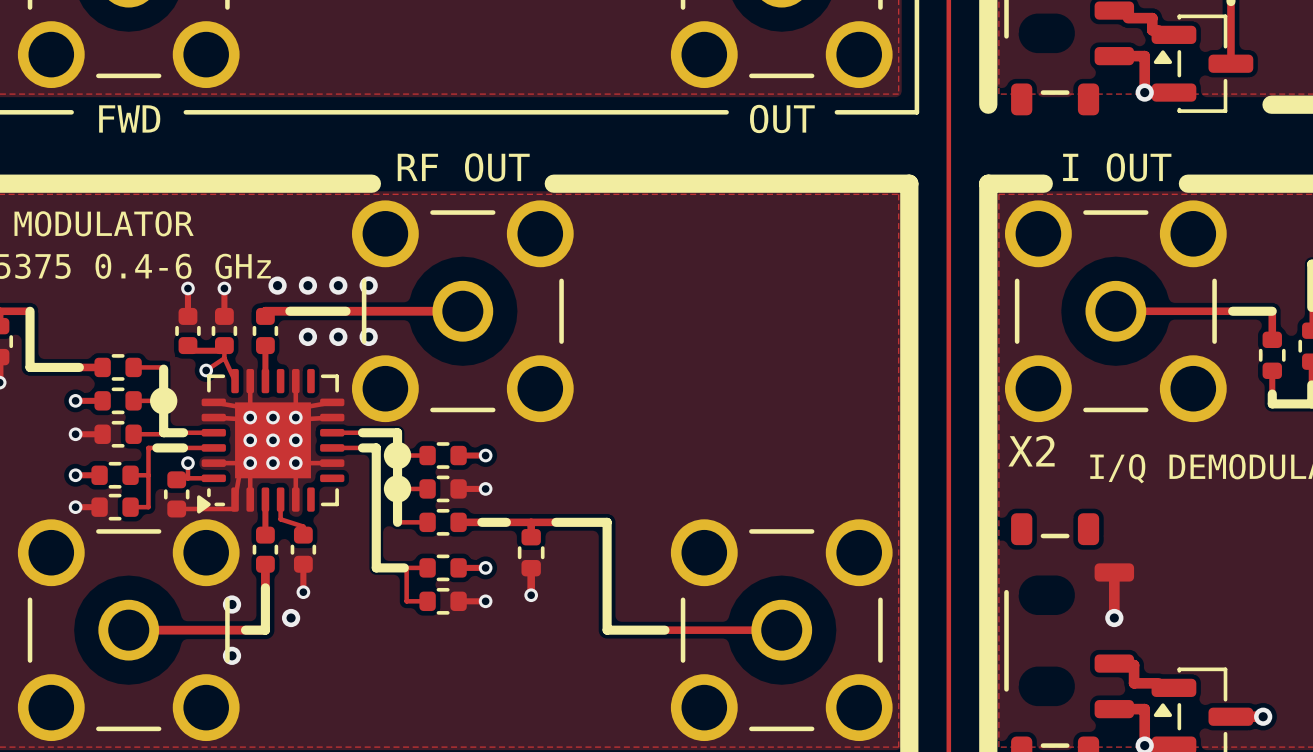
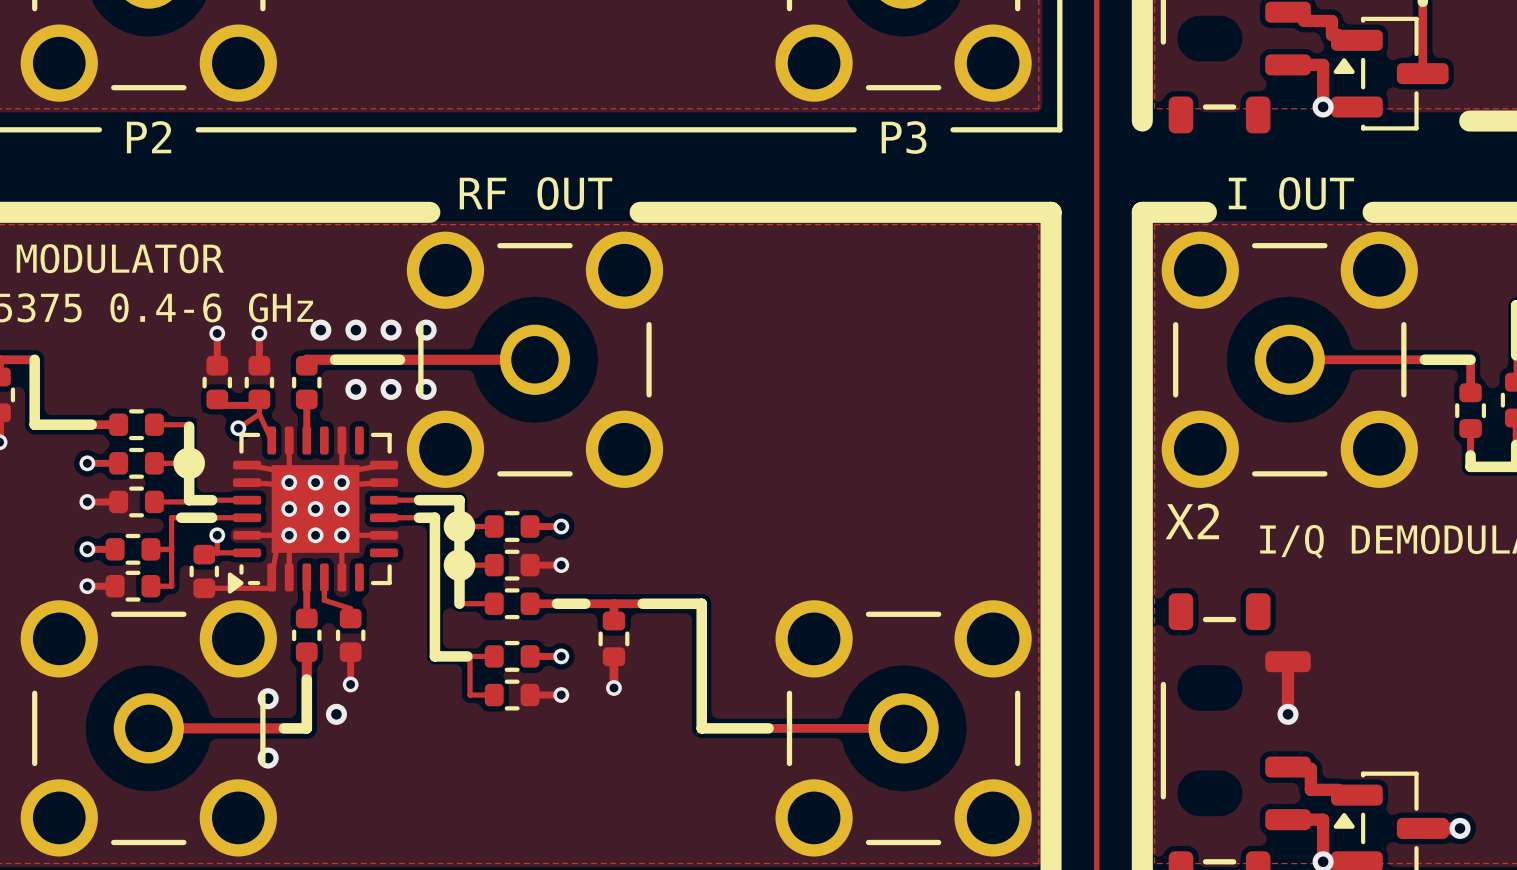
line: none -> (82, 129) (99, 129)
line: none -> (198, 129) (214, 129)
line: none -> (839, 129) (854, 129)
line: none -> (953, 129) (967, 129)
text: FWD (129, 118) -> P2 (149, 137)
text: OUT (782, 118) -> P3 (904, 137)

